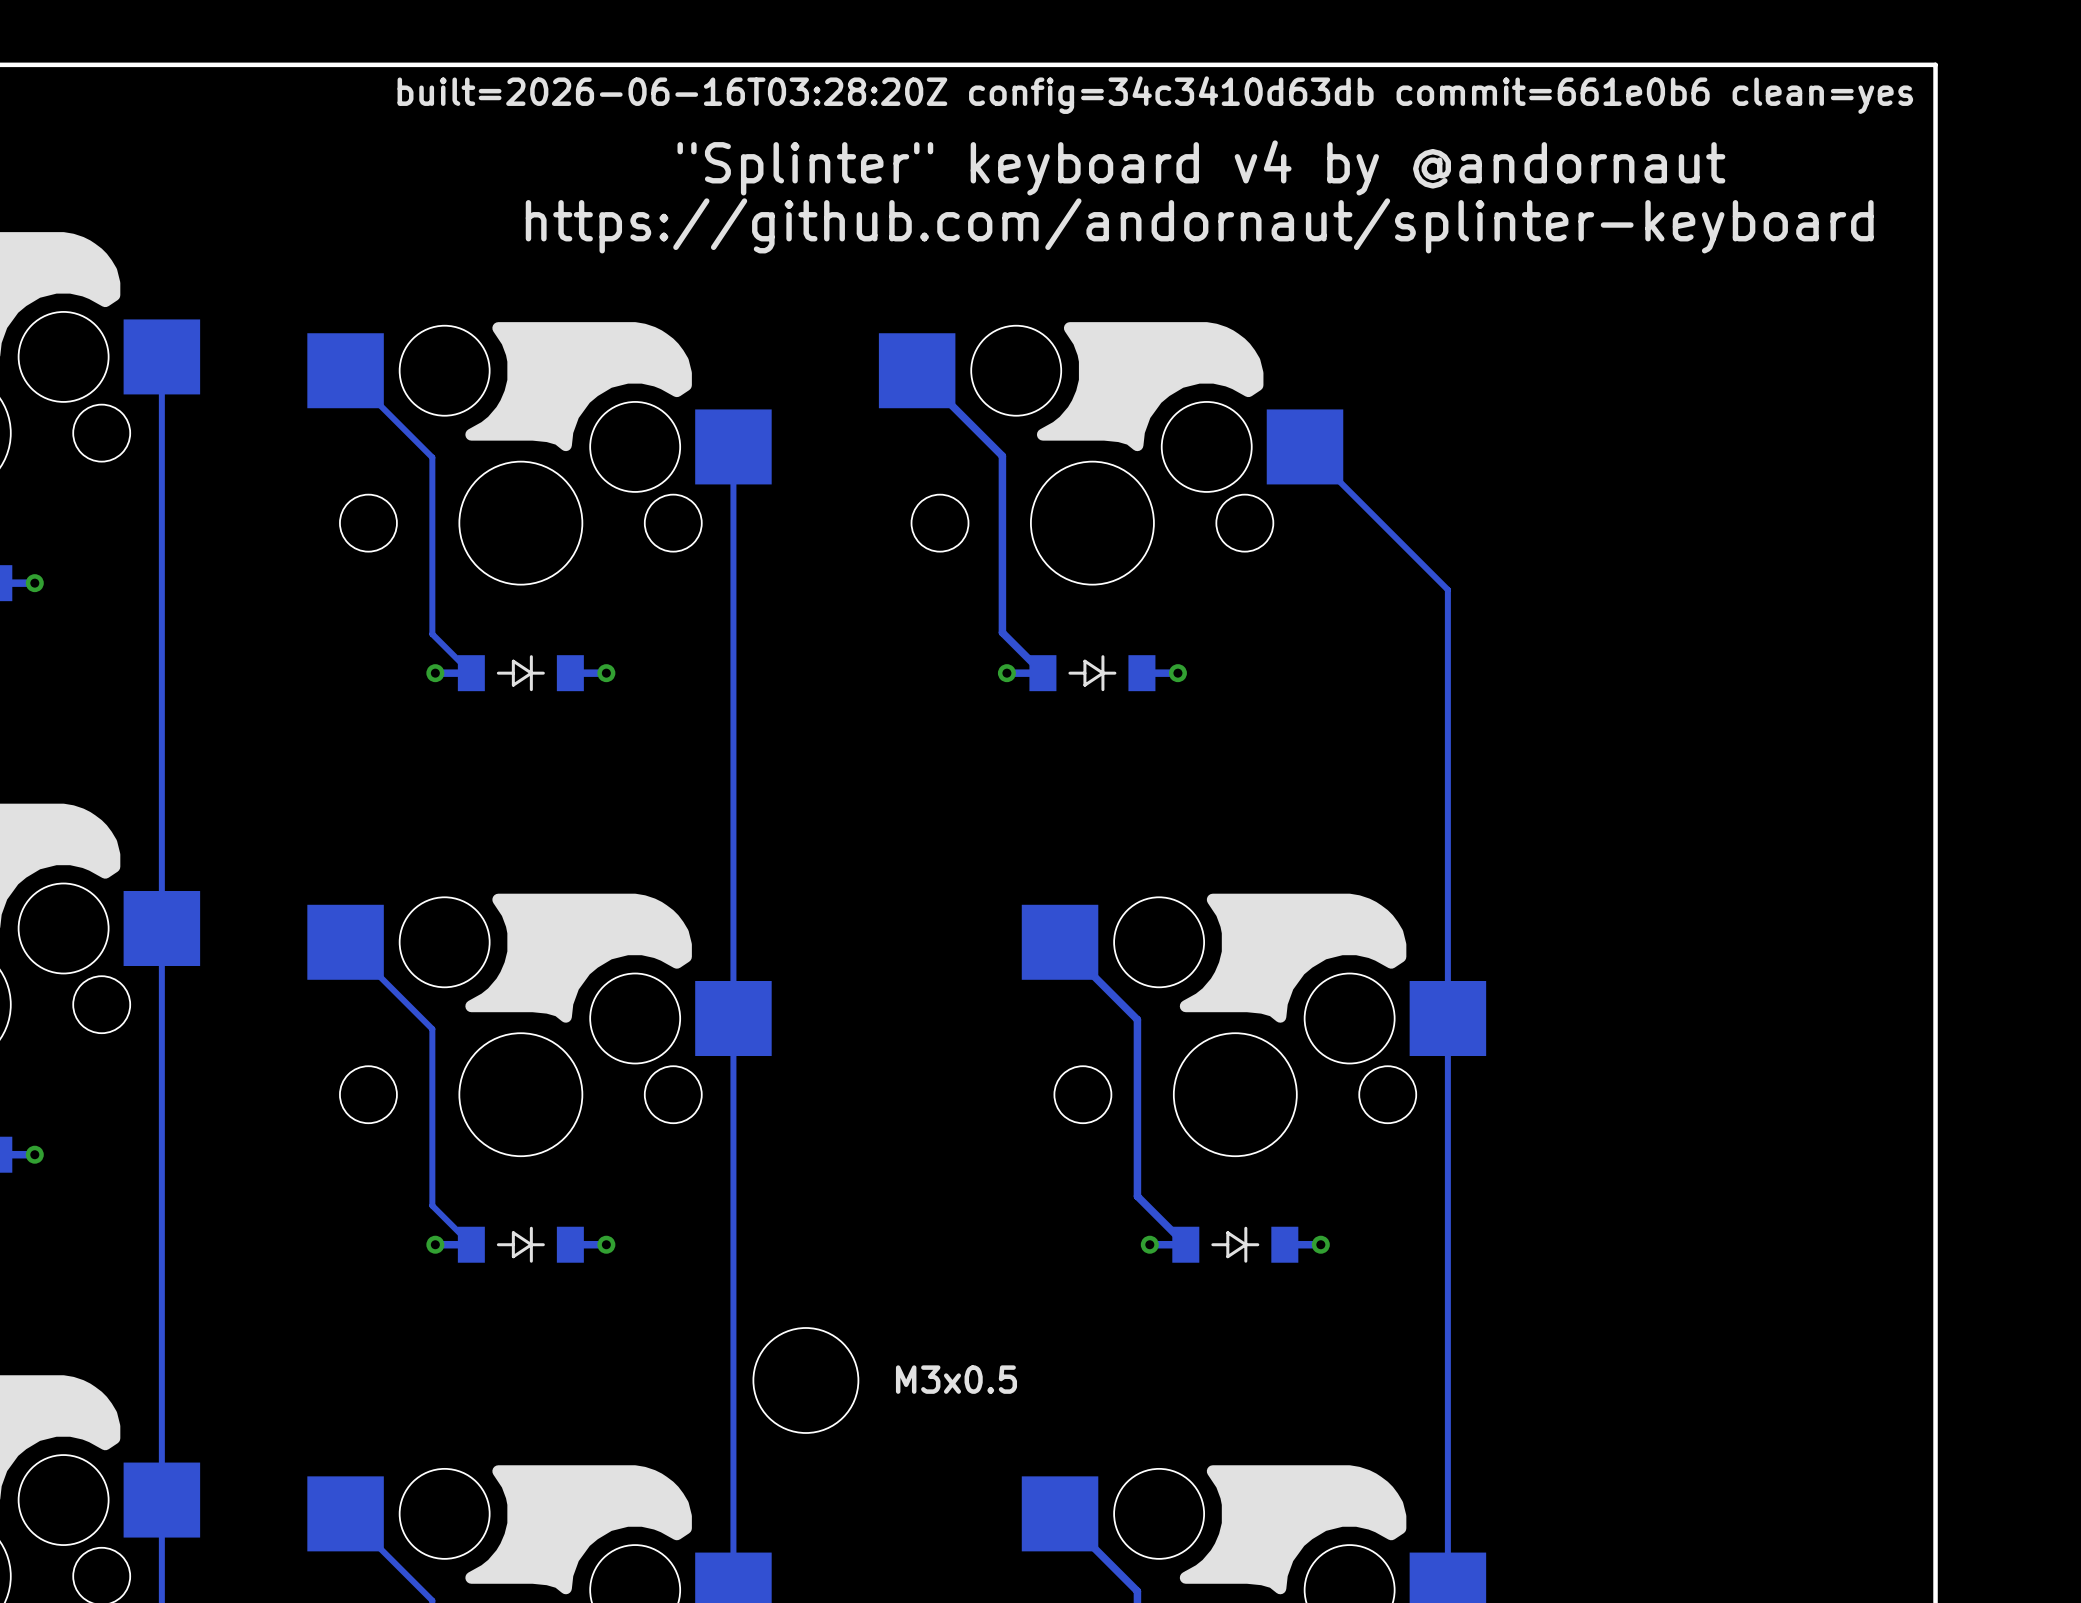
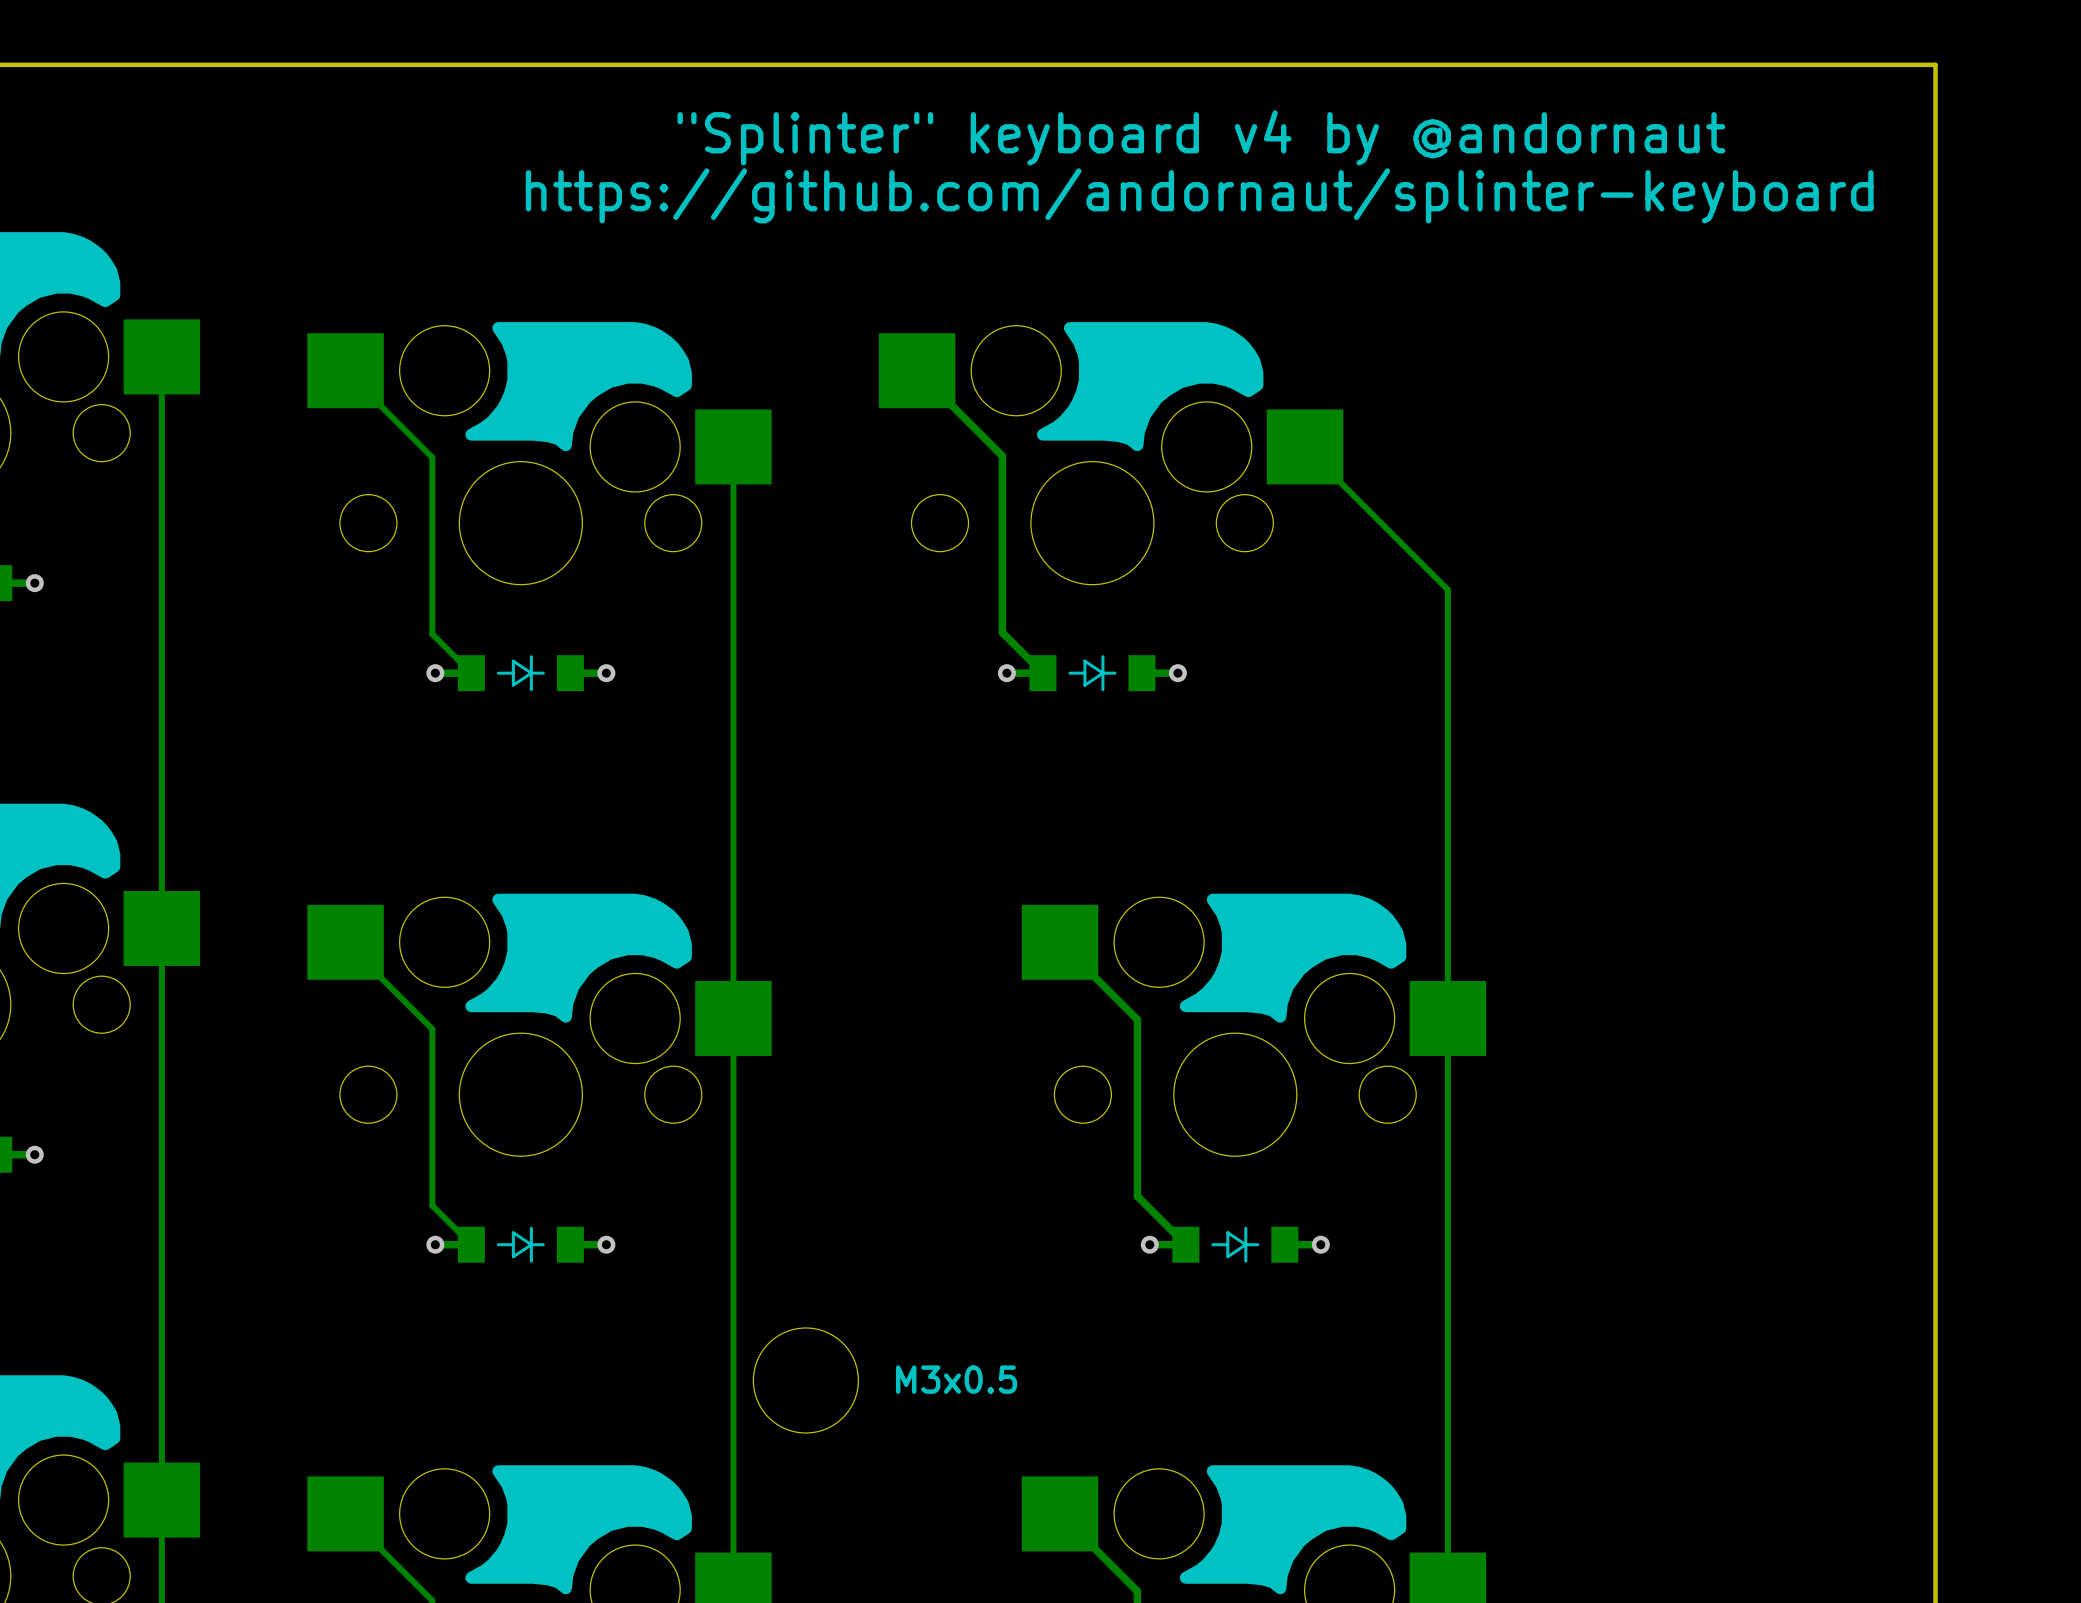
text: built=2026-06-16T03:28:20Z config=34c3410d63db commit=661e0b6 clean=yes (1155, 95) -> none
text position: "Splinter" keyboard v4 by @andornaut (1201, 167) -> "Splinter" keyboard v4 by @andornaut (1201, 137)
text position: https://github.com/andornaut/splinter-keyboard (1199, 225) -> https://github.com/andornaut/splinter-keyboard (1199, 195)

